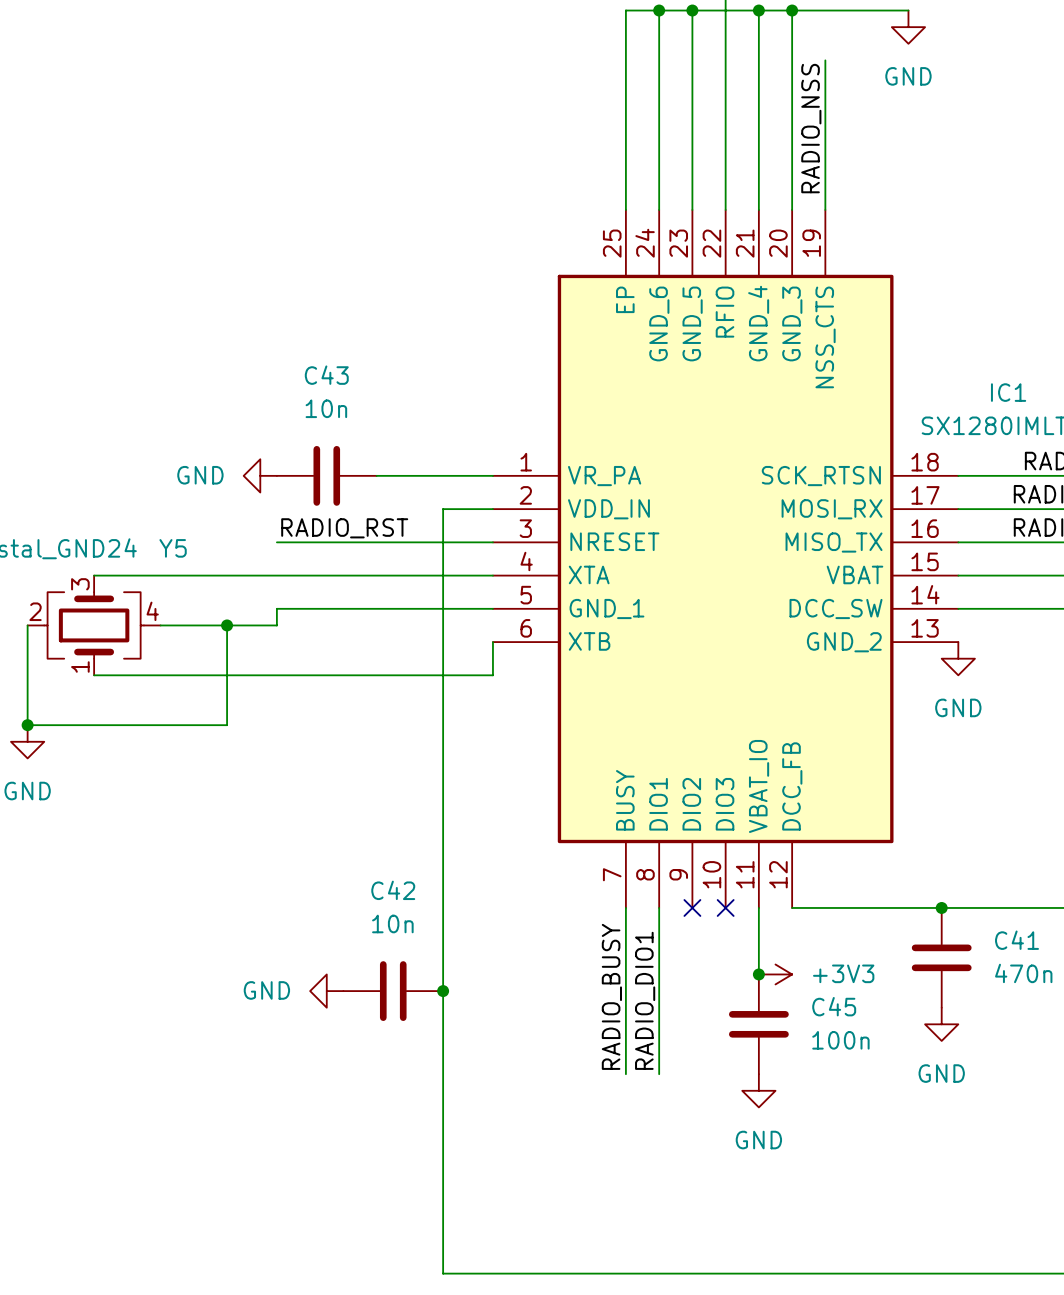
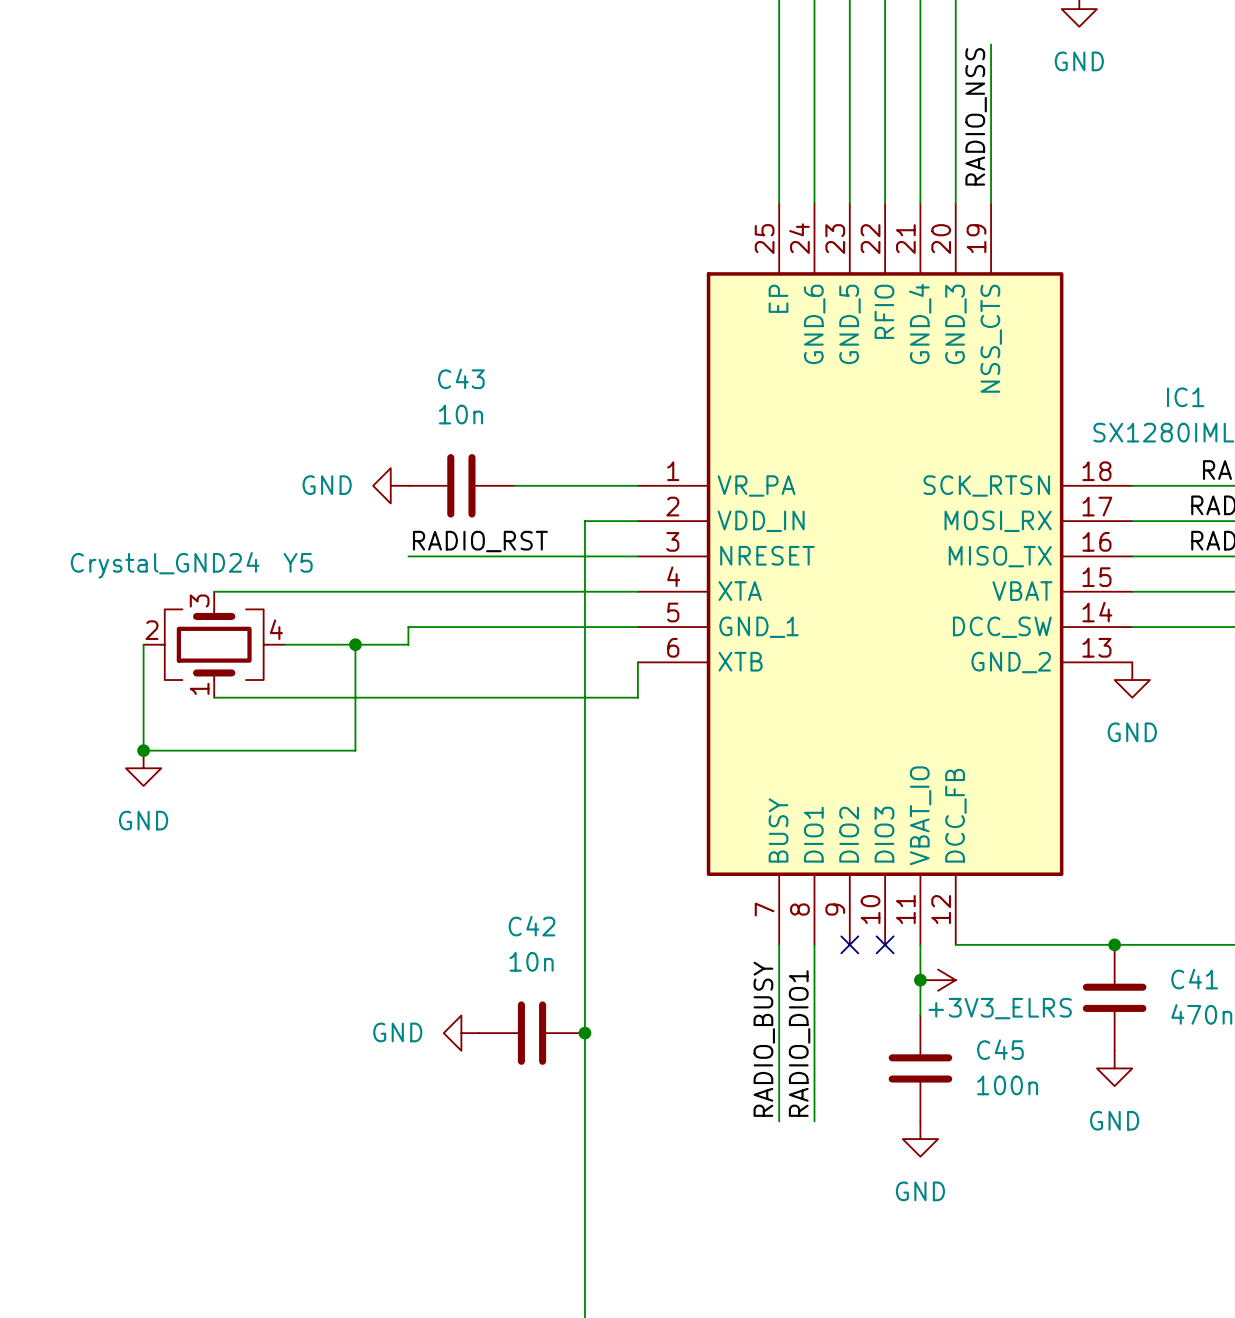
power symbol: none -> +3V3_ELRS (938, 980)
junction position: (758, 974) -> (920, 980)
power symbol: +3V3 (775, 974) -> none

